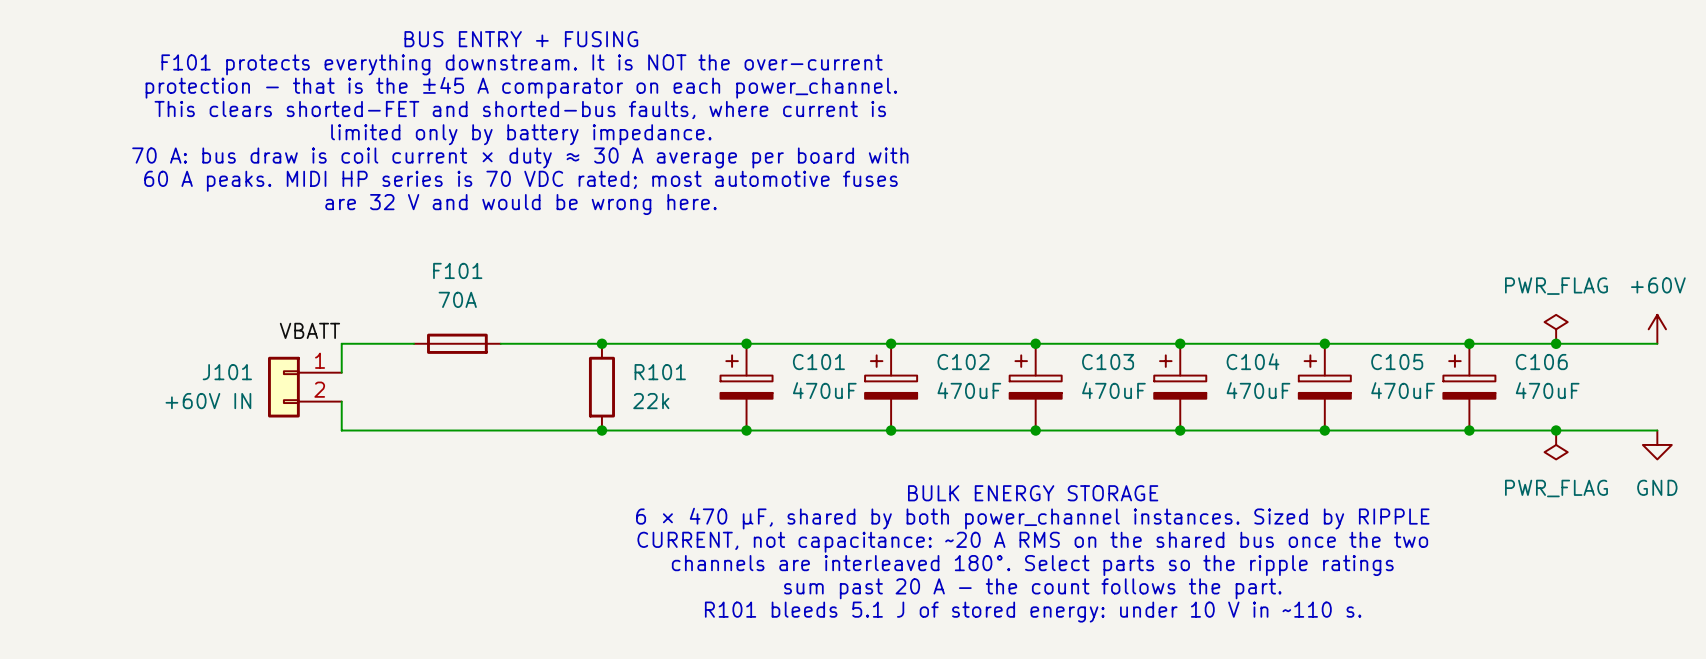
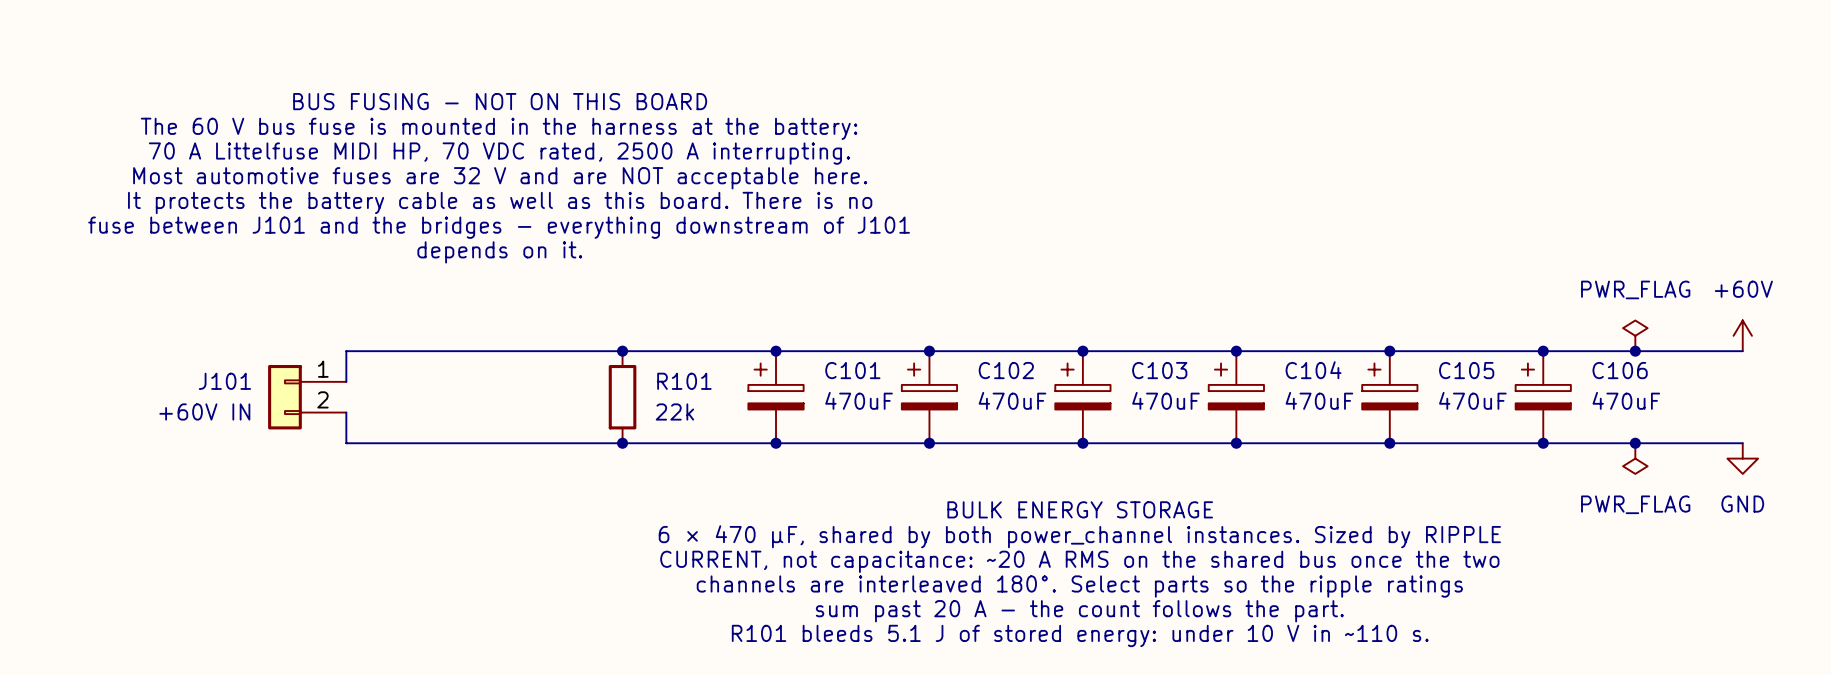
text: BUS ENTRY + FUSING (521, 39) -> none
text: F101 protects everything downstream. It is NOT the over-current (522, 64) -> none
text: protection - that is the ±45 A comparator on each power_channel. (521, 87) -> none
text: none -> BUS FUSING - NOT ON THIS BOARD (500, 101)
text: This clears shorted-FET and shorted-bus faults, where current is (520, 110) -> none
text: none -> The 60 V bus fuse is mounted in the harness at the battery: (499, 128)
text: limited only by battery impedance. (521, 134) -> none
text: none -> 70 A Littelfuse MIDI HP, 70 VDC rated, 2500 A interrupting. (499, 153)
text: 70 A: bus draw is coil current × duty ≈ 30 A average per board with (520, 157) -> none
text: none -> Most automotive fuses are 32 V and are NOT acceptable here. (500, 178)
text: 60 A peaks. MIDI HP series is 70 VDC rated; most automotive fuses (521, 181) -> none
text: none -> It protects the battery cable as well as this board. There is no (500, 202)
text: are 32 V and would be wrong here. (521, 204) -> none
text: none -> fuse between J101 and the bridges - everything downstream of J101 (499, 227)
text: none -> depends on it. (499, 252)
label: VBATT (309, 330) -> none
F101: 70A (457, 343) -> none

